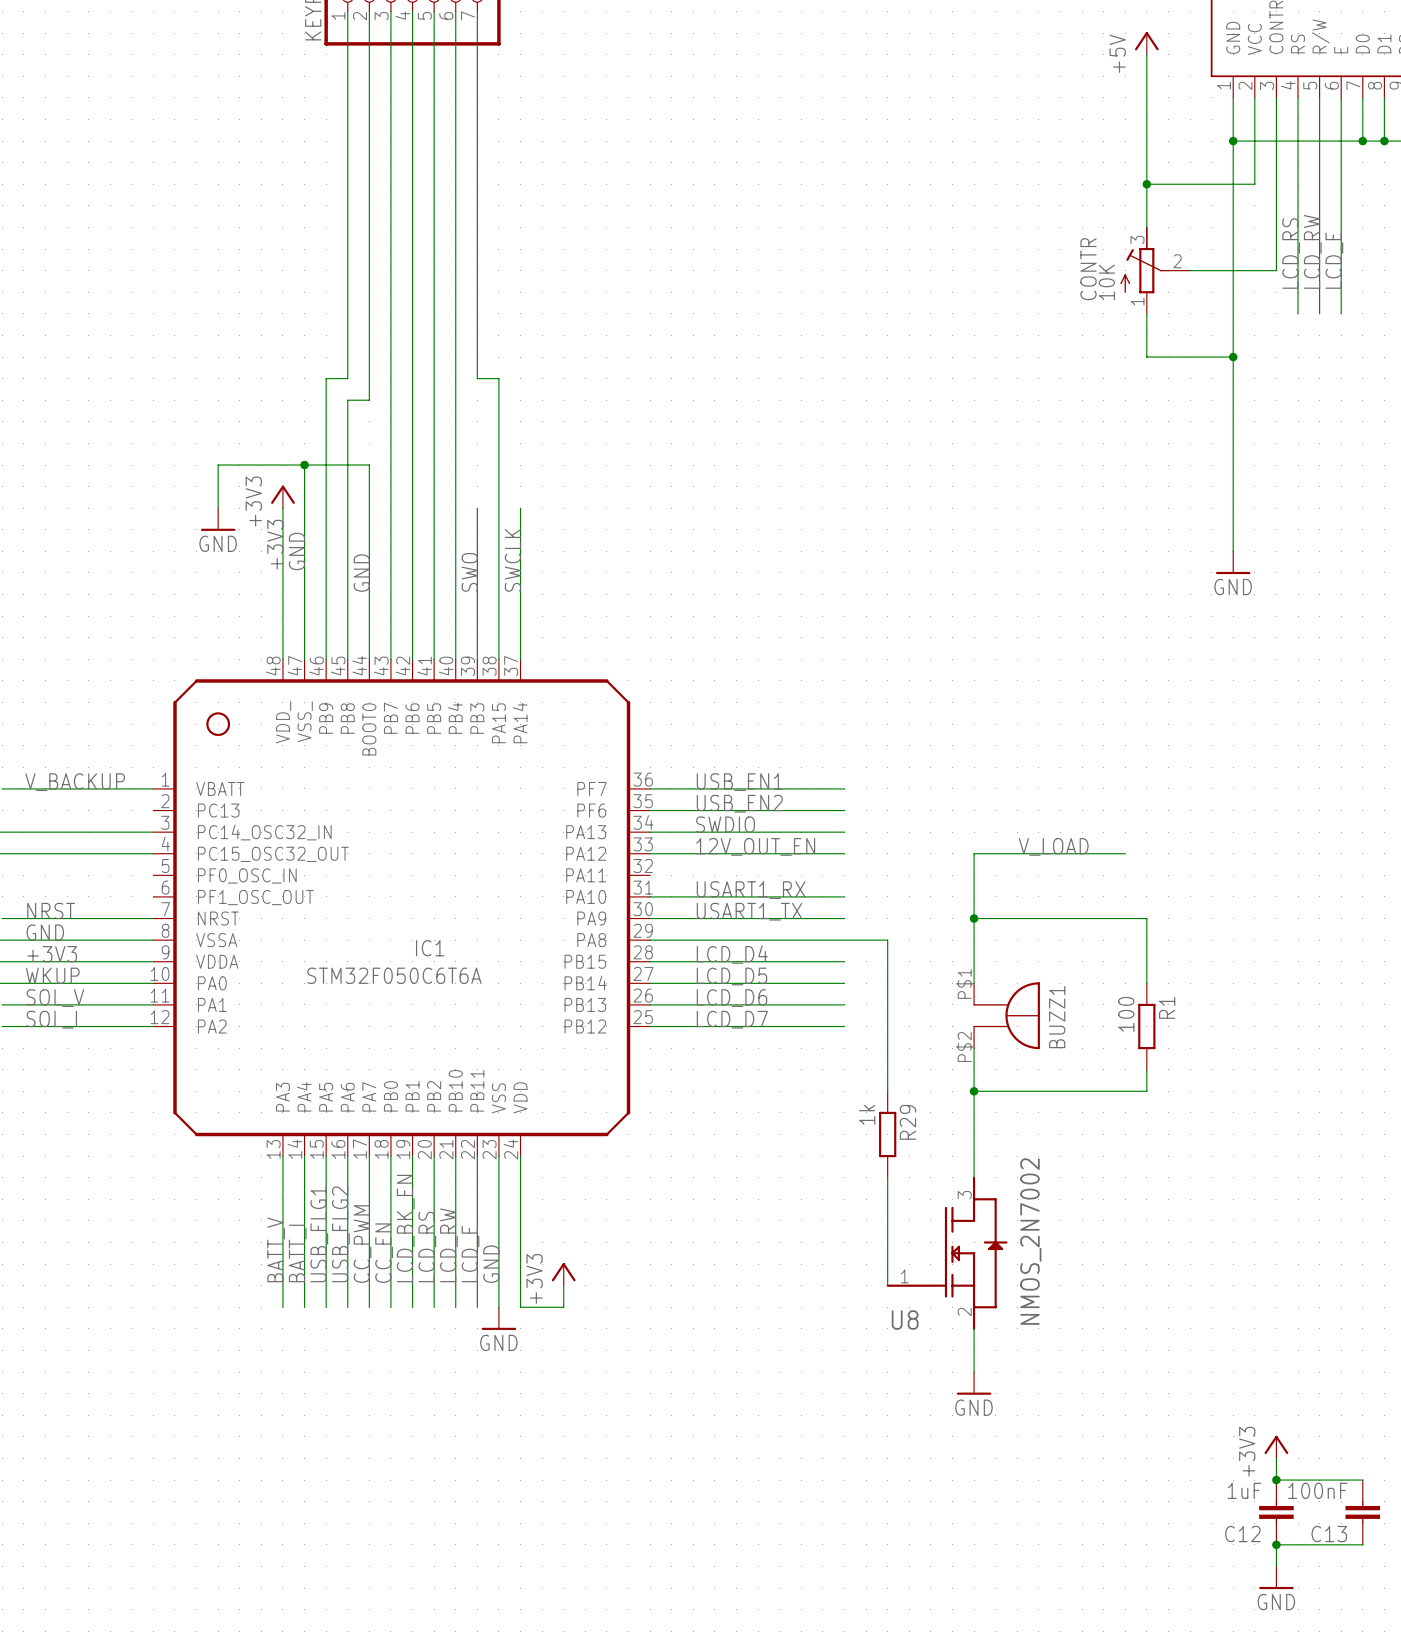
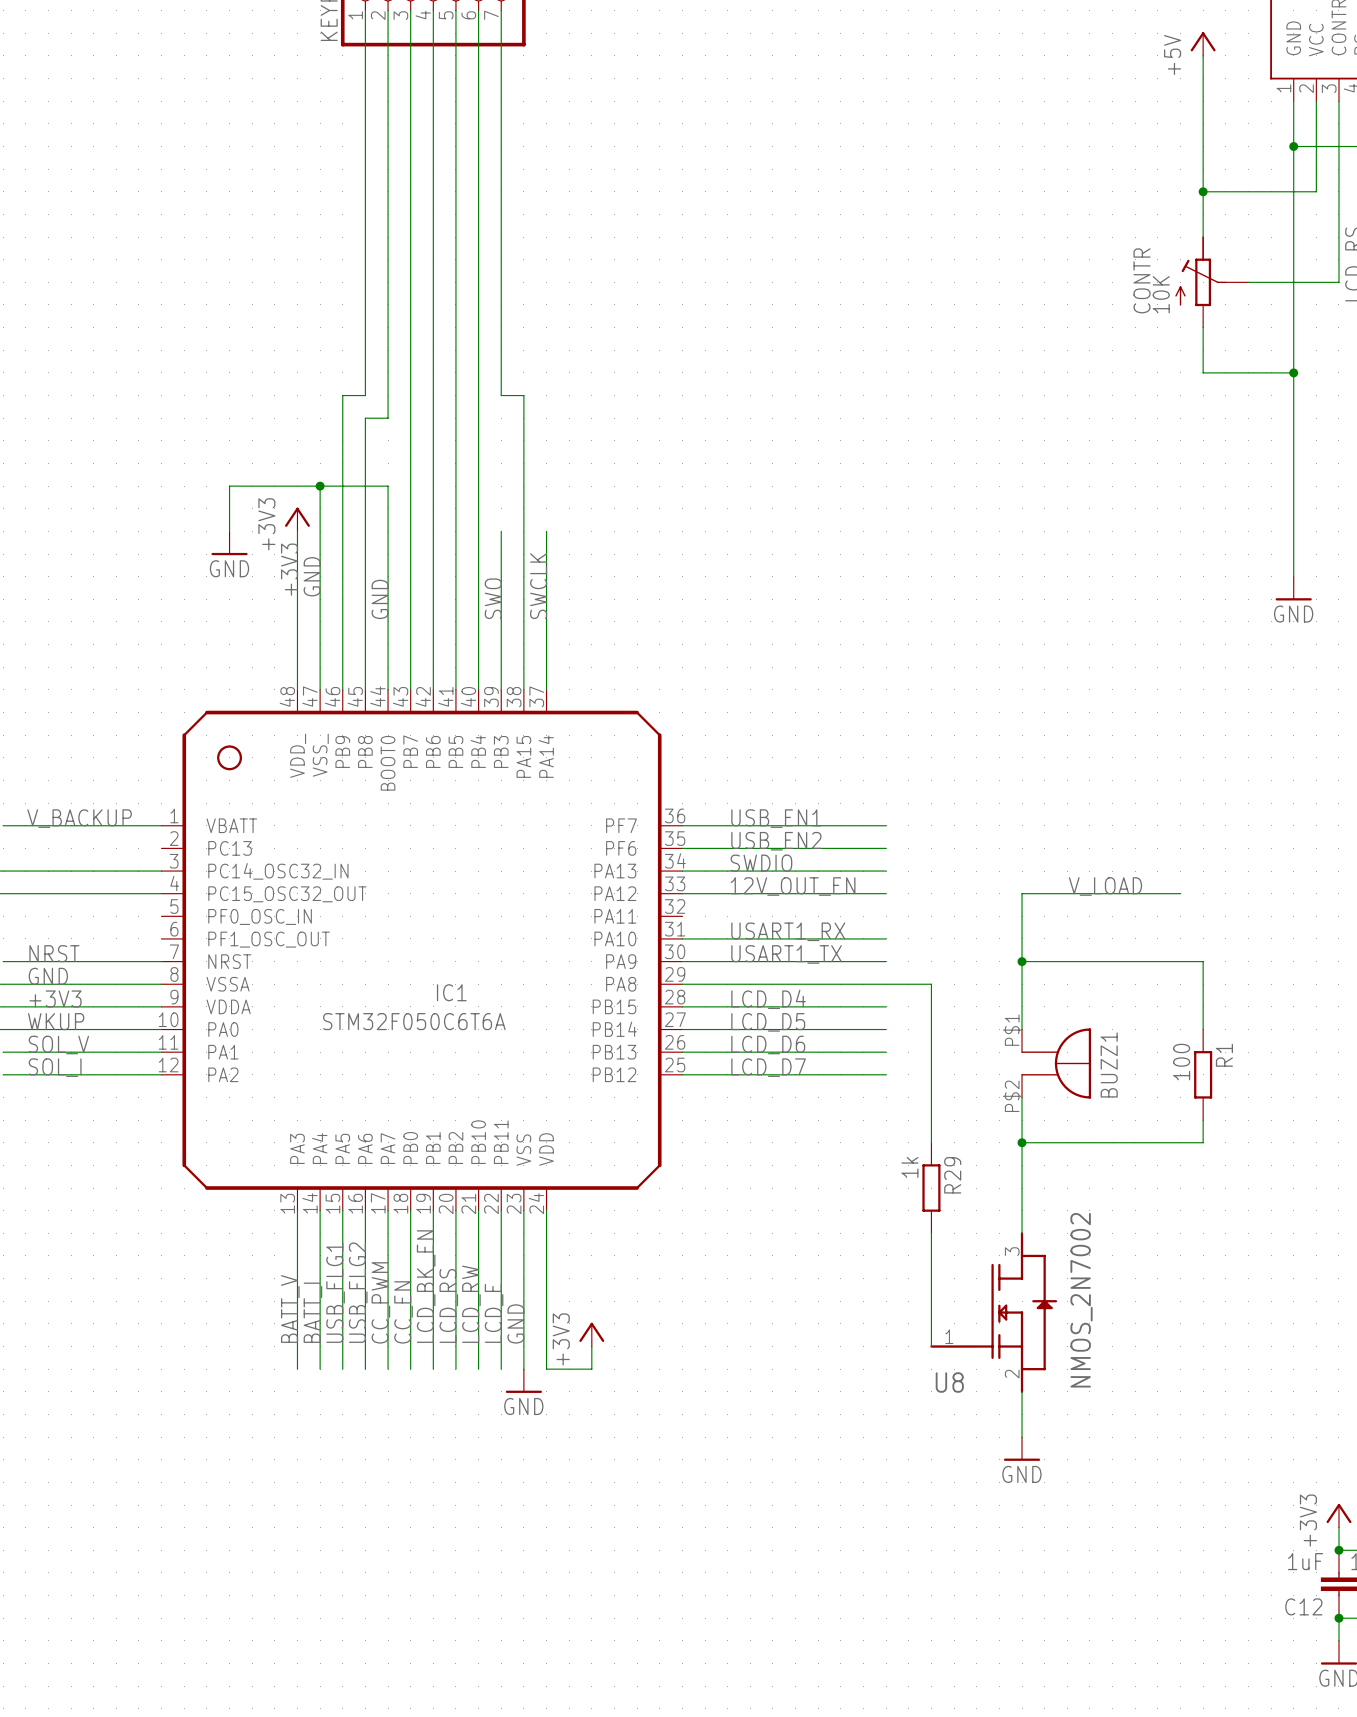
CONTR pin number: 3 (1137, 239) -> none
CONTR pin number: 2 (1177, 261) -> none
CONTR pin number: 1 (1137, 301) -> none

